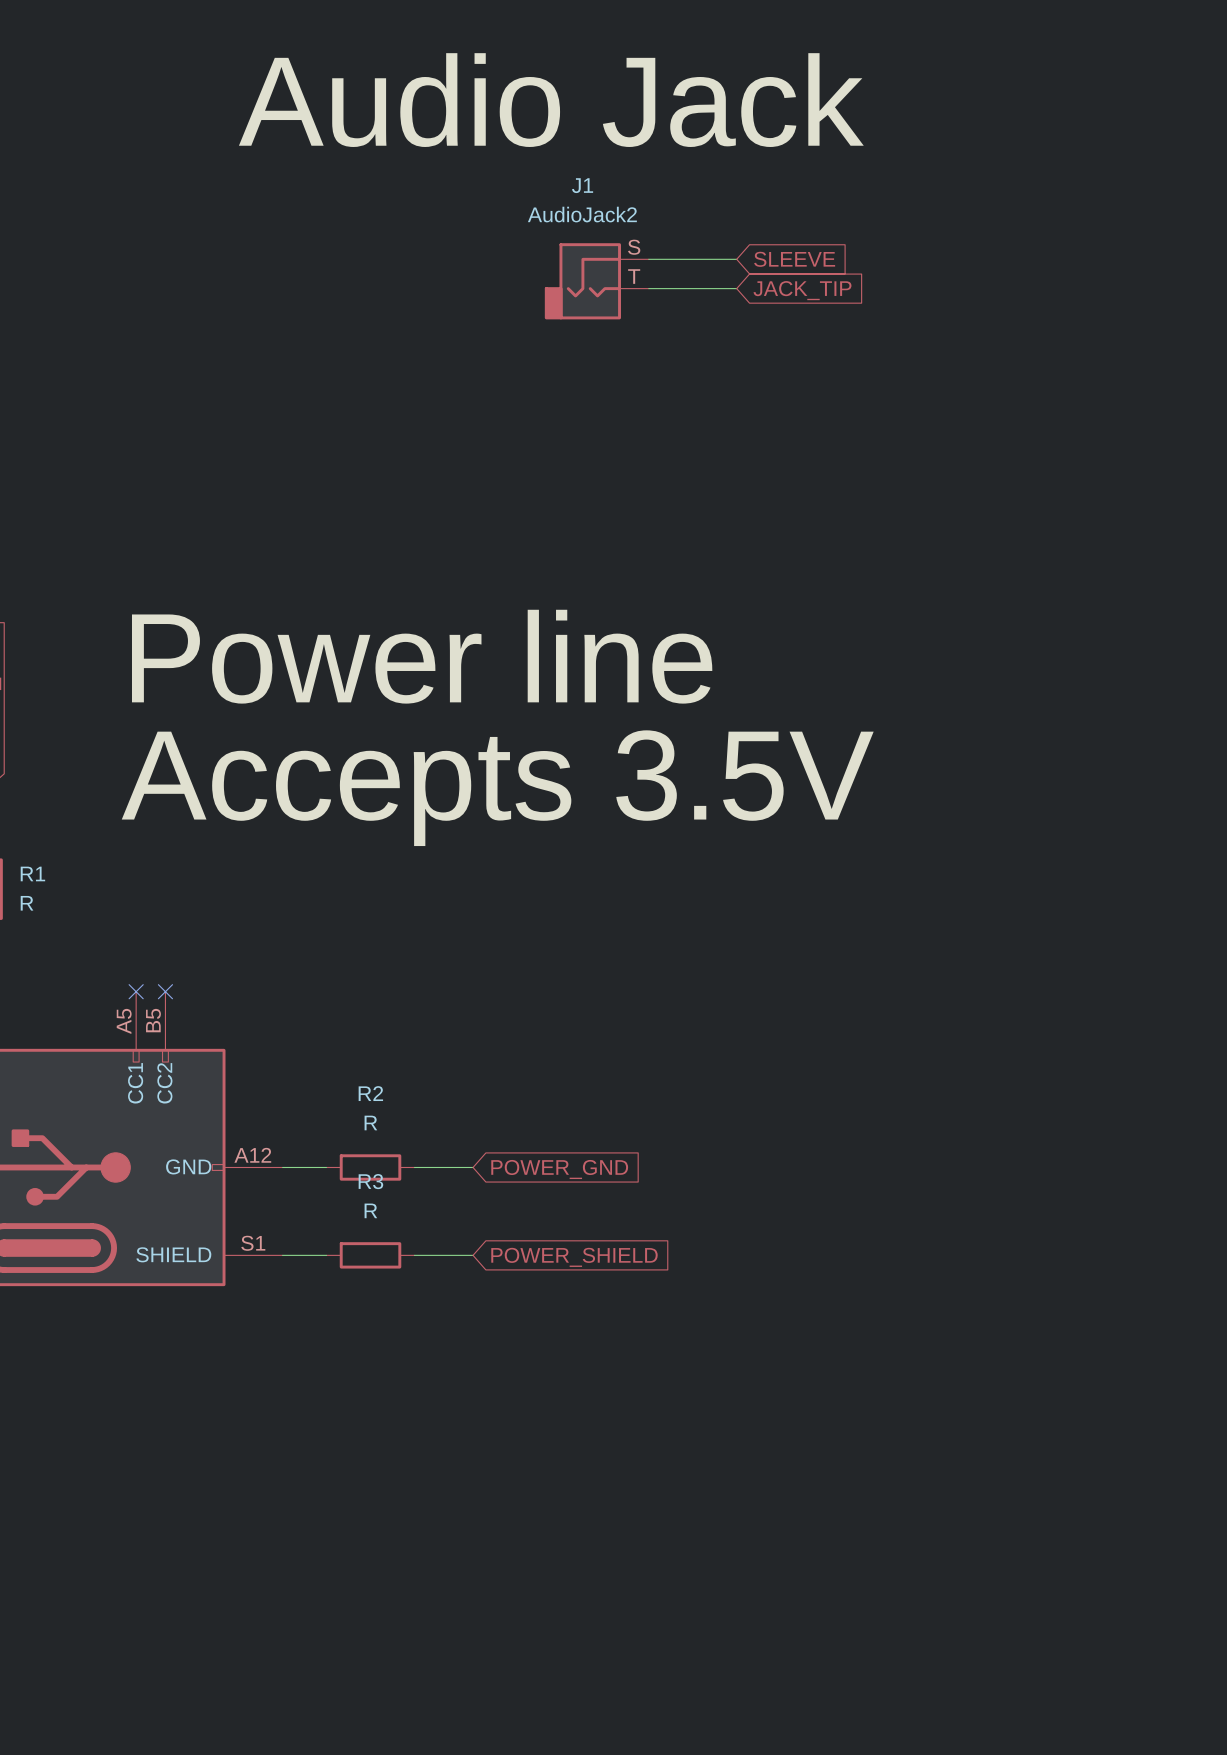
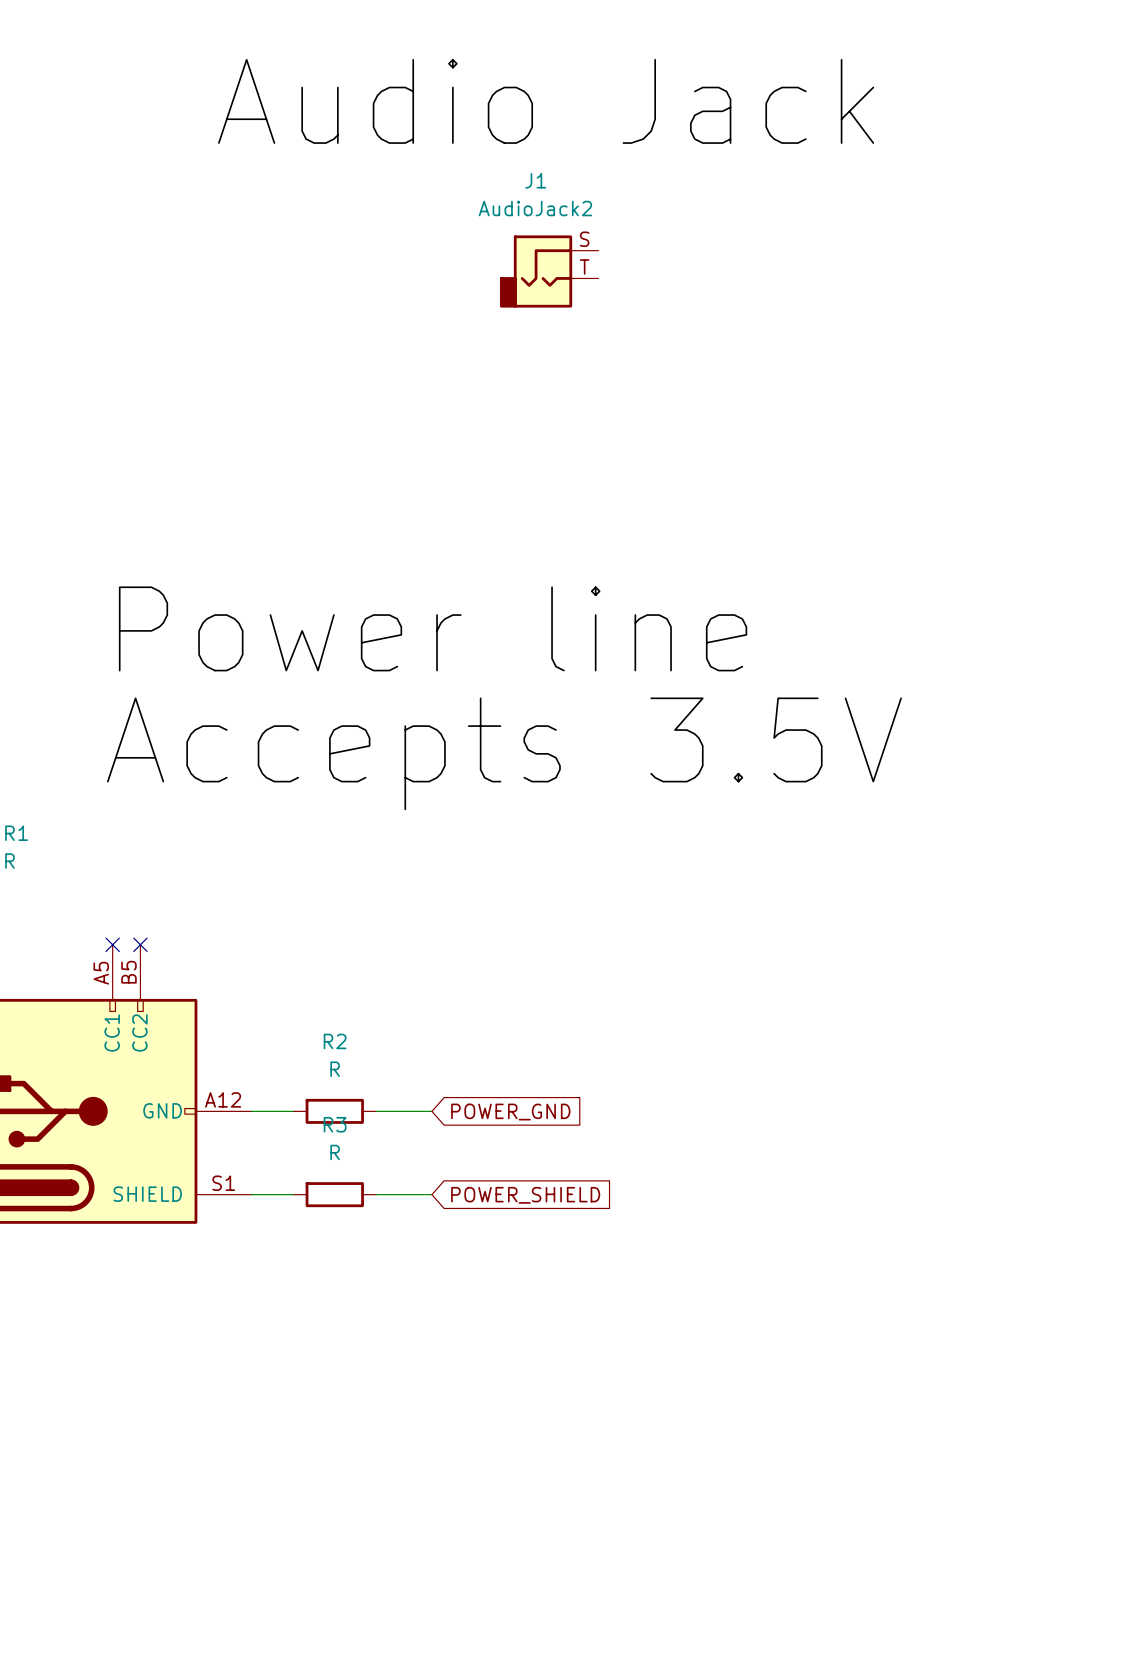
wire: (648, 259) (736, 259) -> none
global label: SLEEVE (794, 259) -> none
wire: (648, 288) (736, 288) -> none
global label: JACK_TIP (802, 290) -> none

